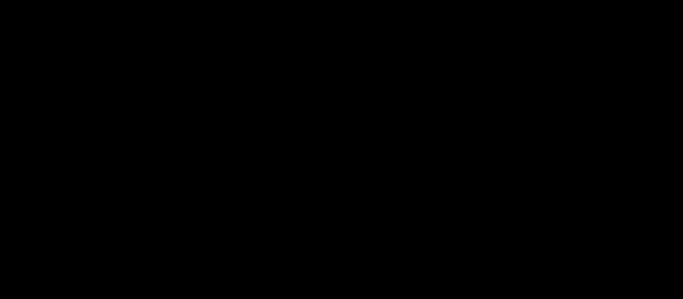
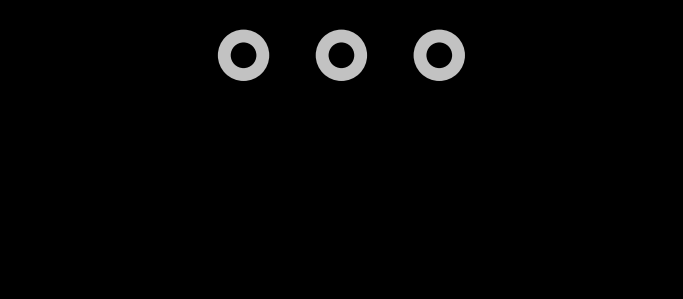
via: none -> (243, 55)
via: none -> (341, 55)
via: none -> (439, 55)

